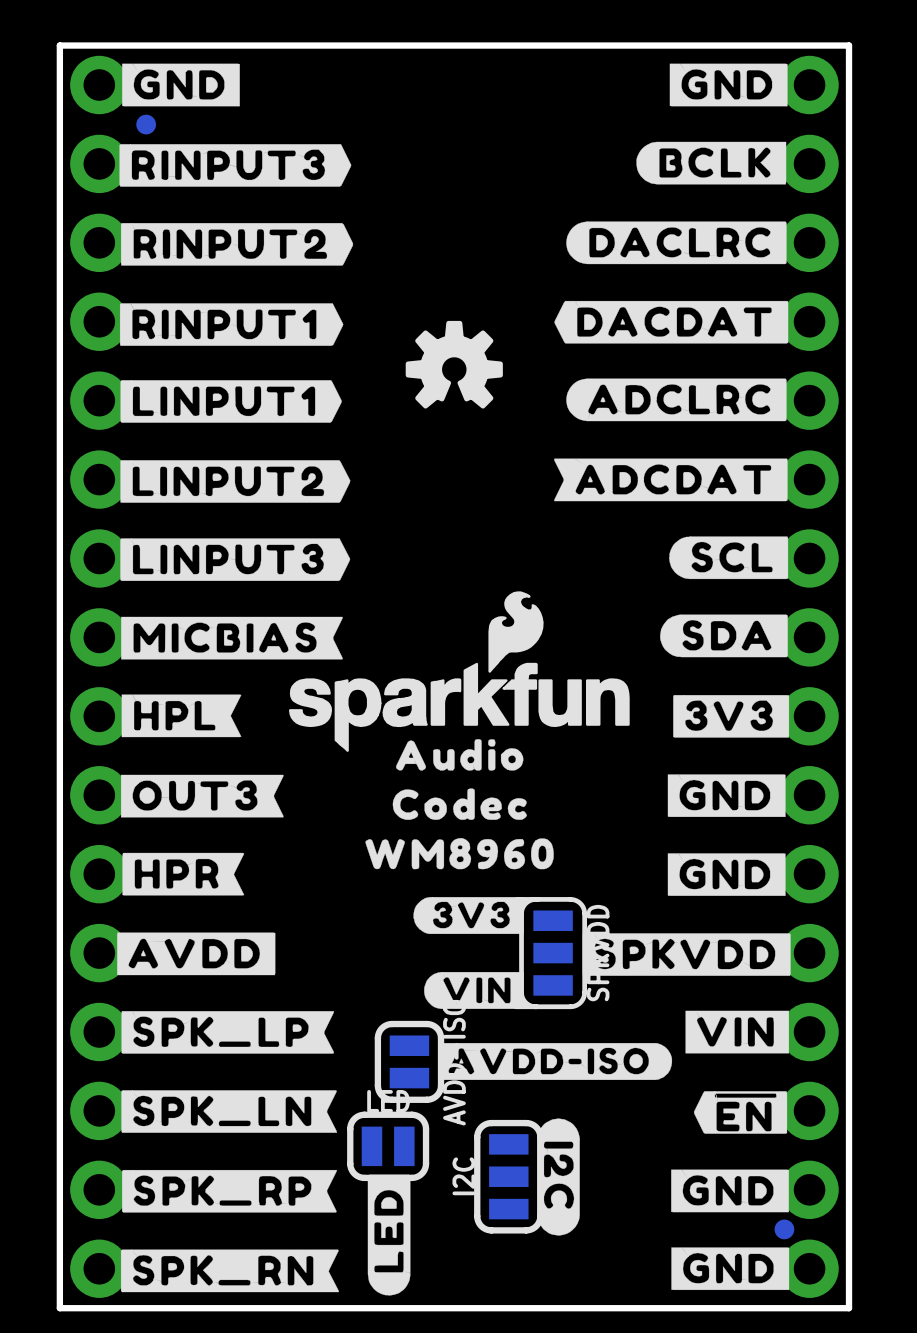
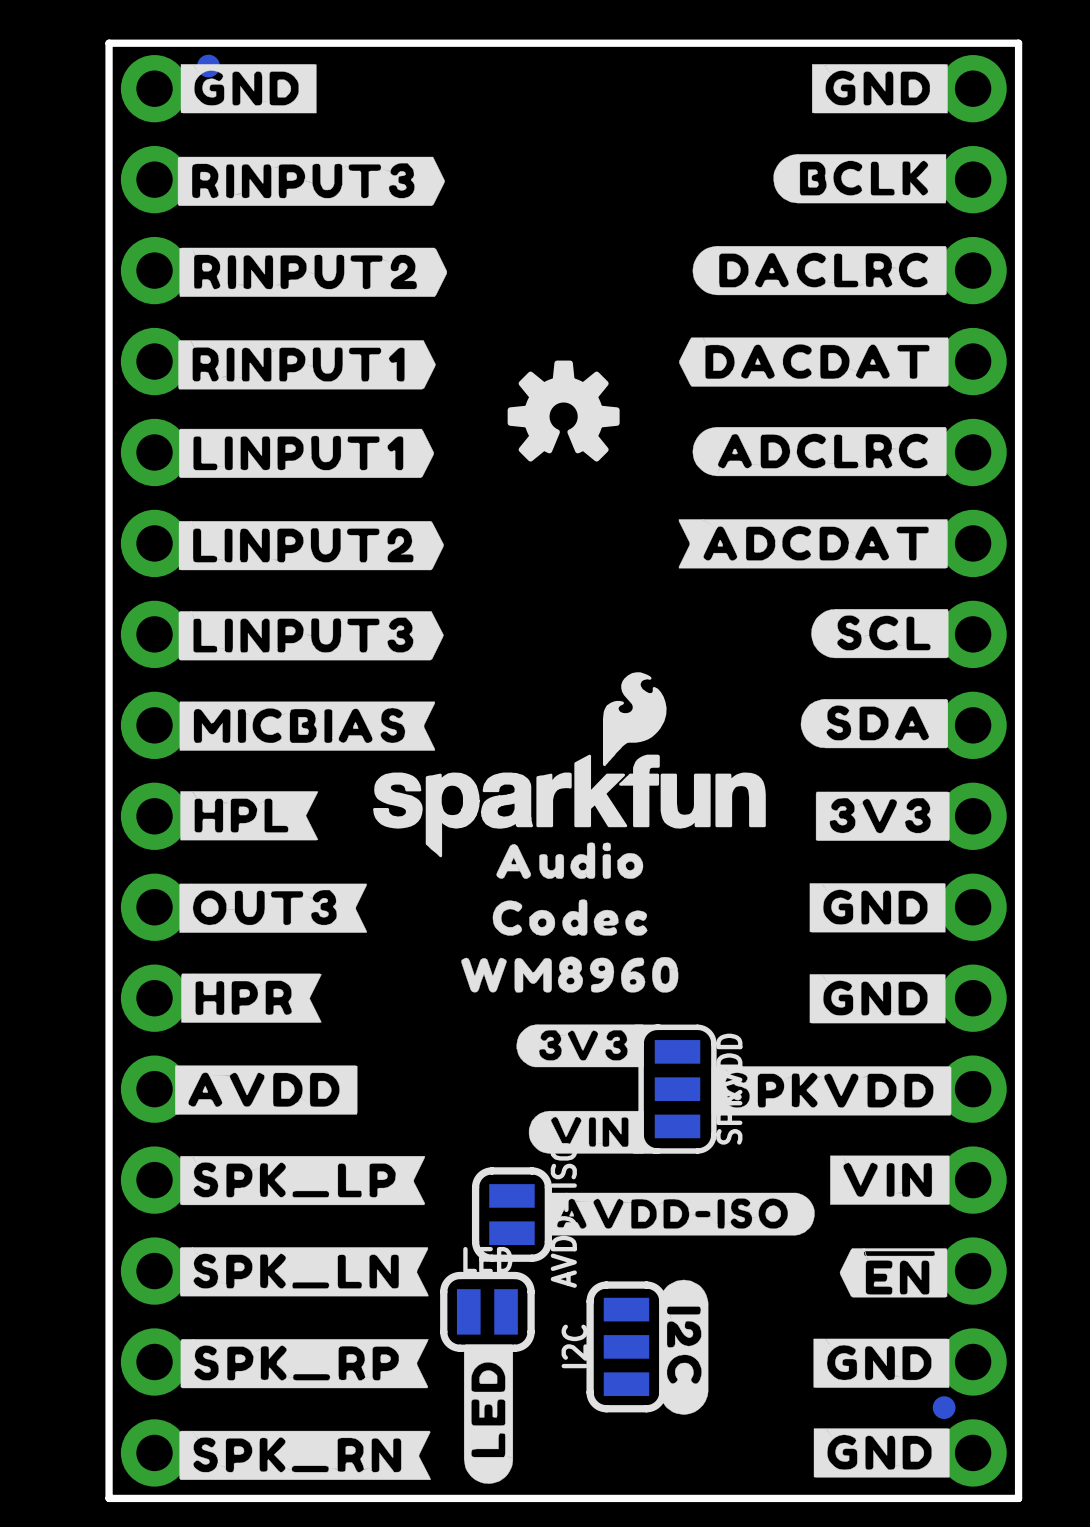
part position: (146, 124) -> (208, 66)

